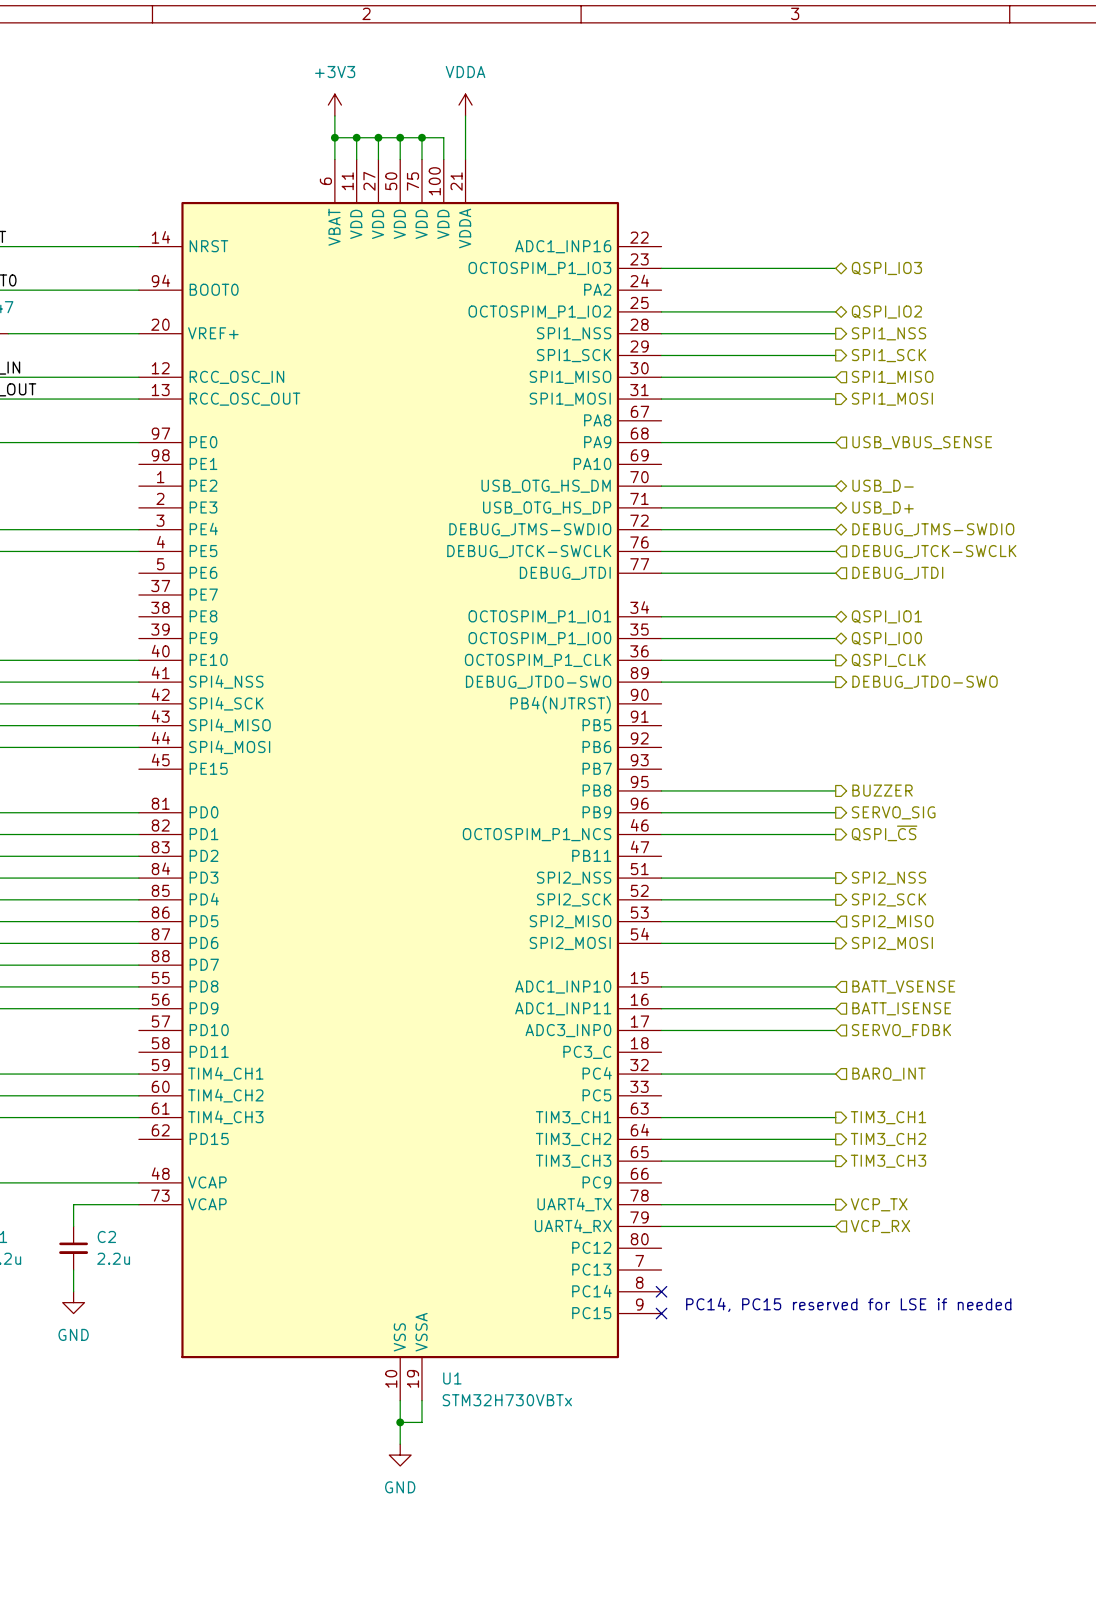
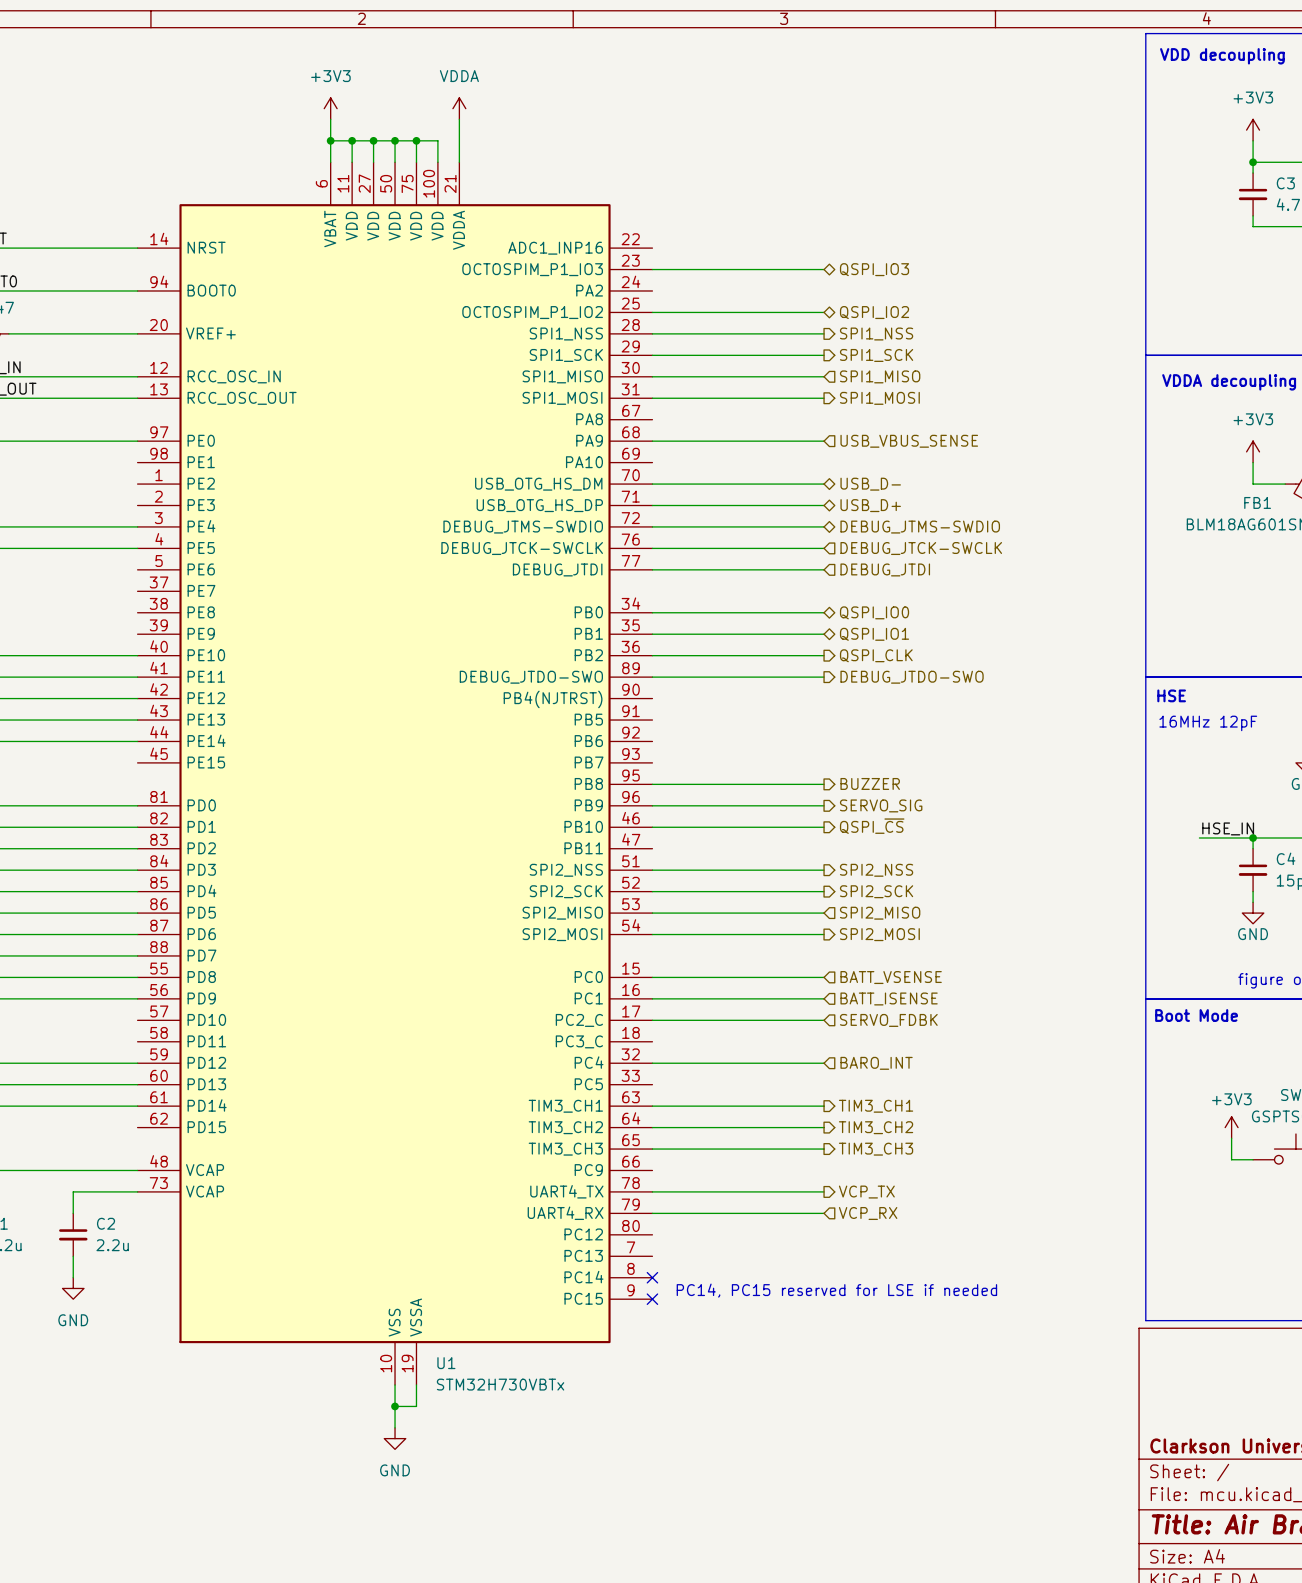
U1 symbol: [138, 159, 662, 1401] -> [137, 162, 653, 1385]
hierarchical label: QSPI_IO1 (886, 616) -> QSPI_IO0 (874, 612)
hierarchical label: QSPI_IO0 (886, 638) -> QSPI_IO1 (874, 634)

